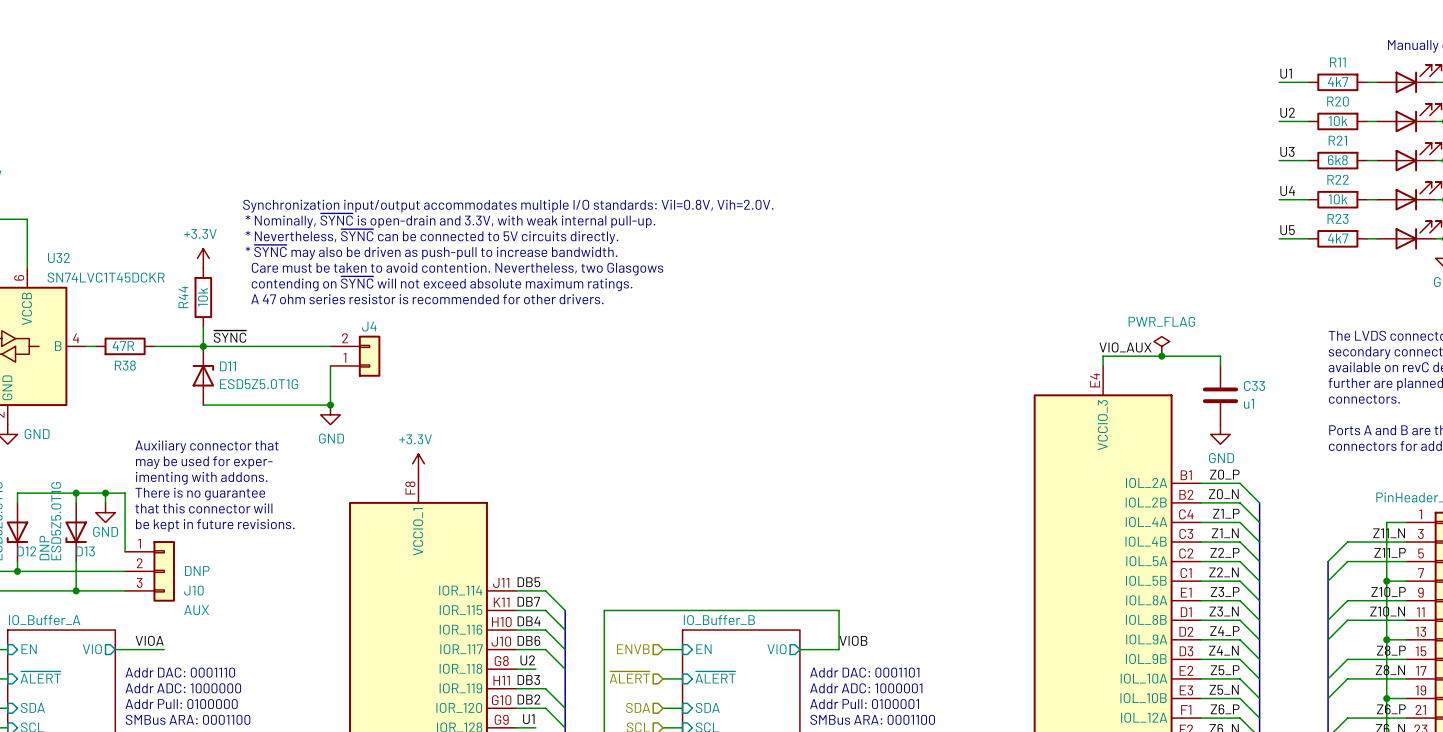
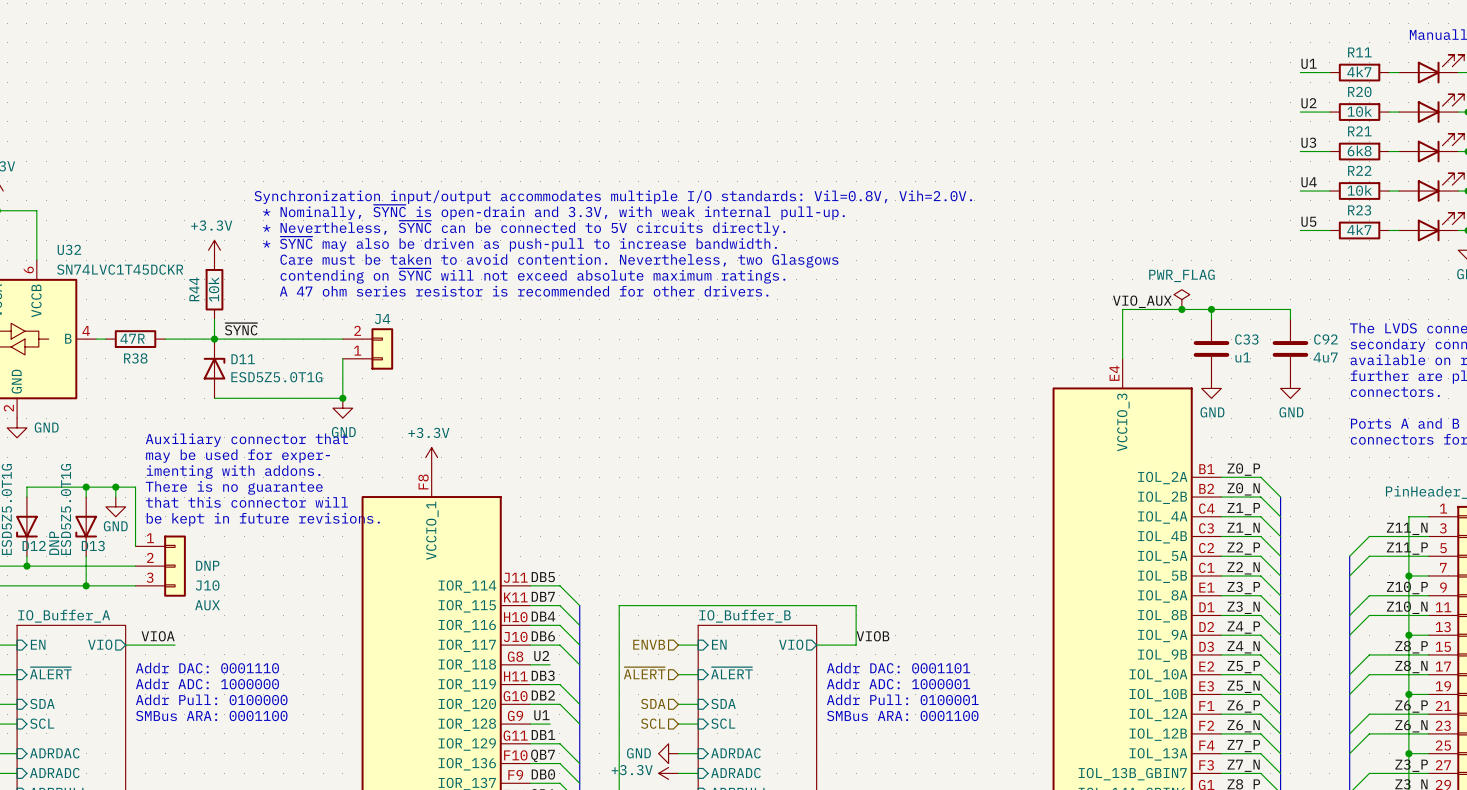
junction: none -> (1181, 309)
wire: none -> (1211, 309) (1211, 319)
junction: none -> (1211, 309)
power symbol position: PWR_FLAG (1161, 346) -> PWR_FLAG (1181, 299)
label position: VIO_AUX (1125, 347) -> VIO_AUX (1142, 301)
wire: (1103, 356) (1220, 356) (1220, 365) -> (1122, 348) (1122, 309) (1290, 309) (1290, 319)
junction: (1161, 356) -> none
C92: none -> 4u7 (1290, 348)
power symbol: none -> GND (1211, 388)
C33 position: (1220, 395) -> (1211, 348)
power symbol: none -> GND (1290, 388)
power symbol: GND (1220, 434) -> none

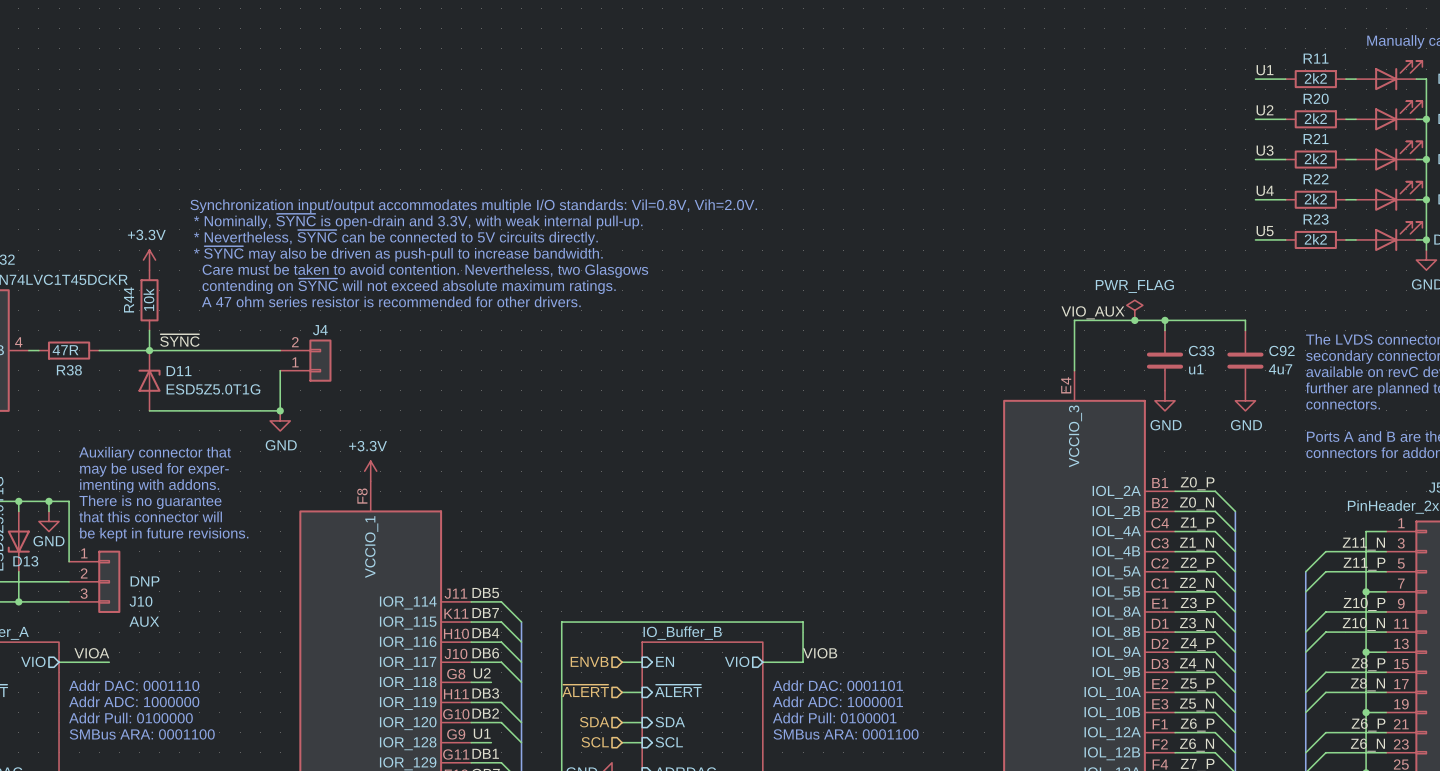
R11 value: 4k7 (1359, 71) -> 2k2 (1315, 78)
R20 value: 10k (1359, 111) -> 2k2 (1315, 118)
R21 value: 6k8 (1359, 150) -> 2k2 (1315, 158)
R22 value: 10k (1359, 190) -> 2k2 (1315, 199)
R23 value: 4k7 (1359, 229) -> 2k2 (1315, 239)

